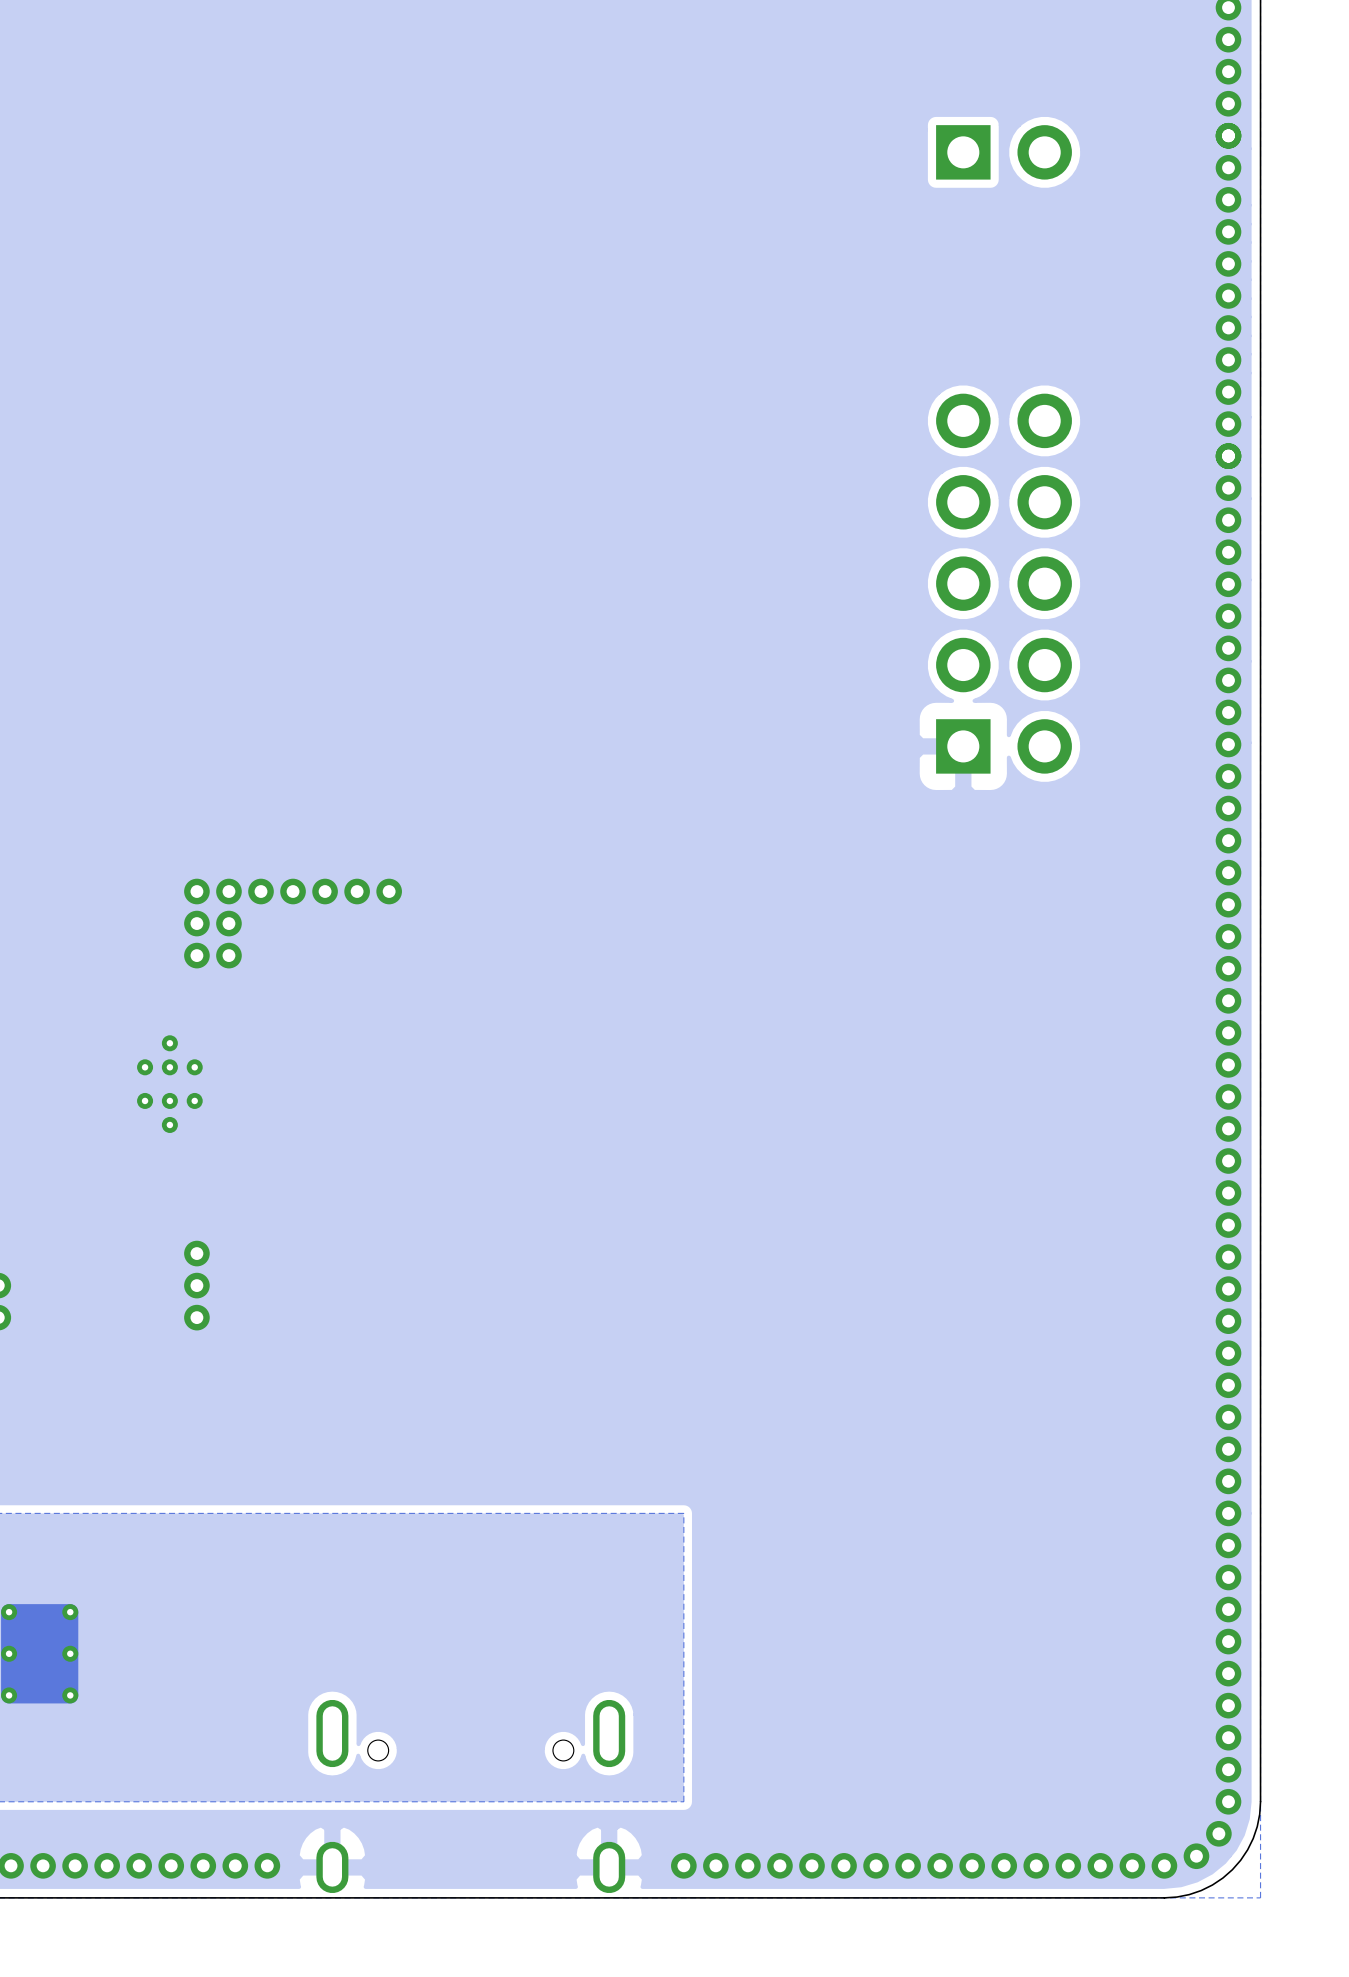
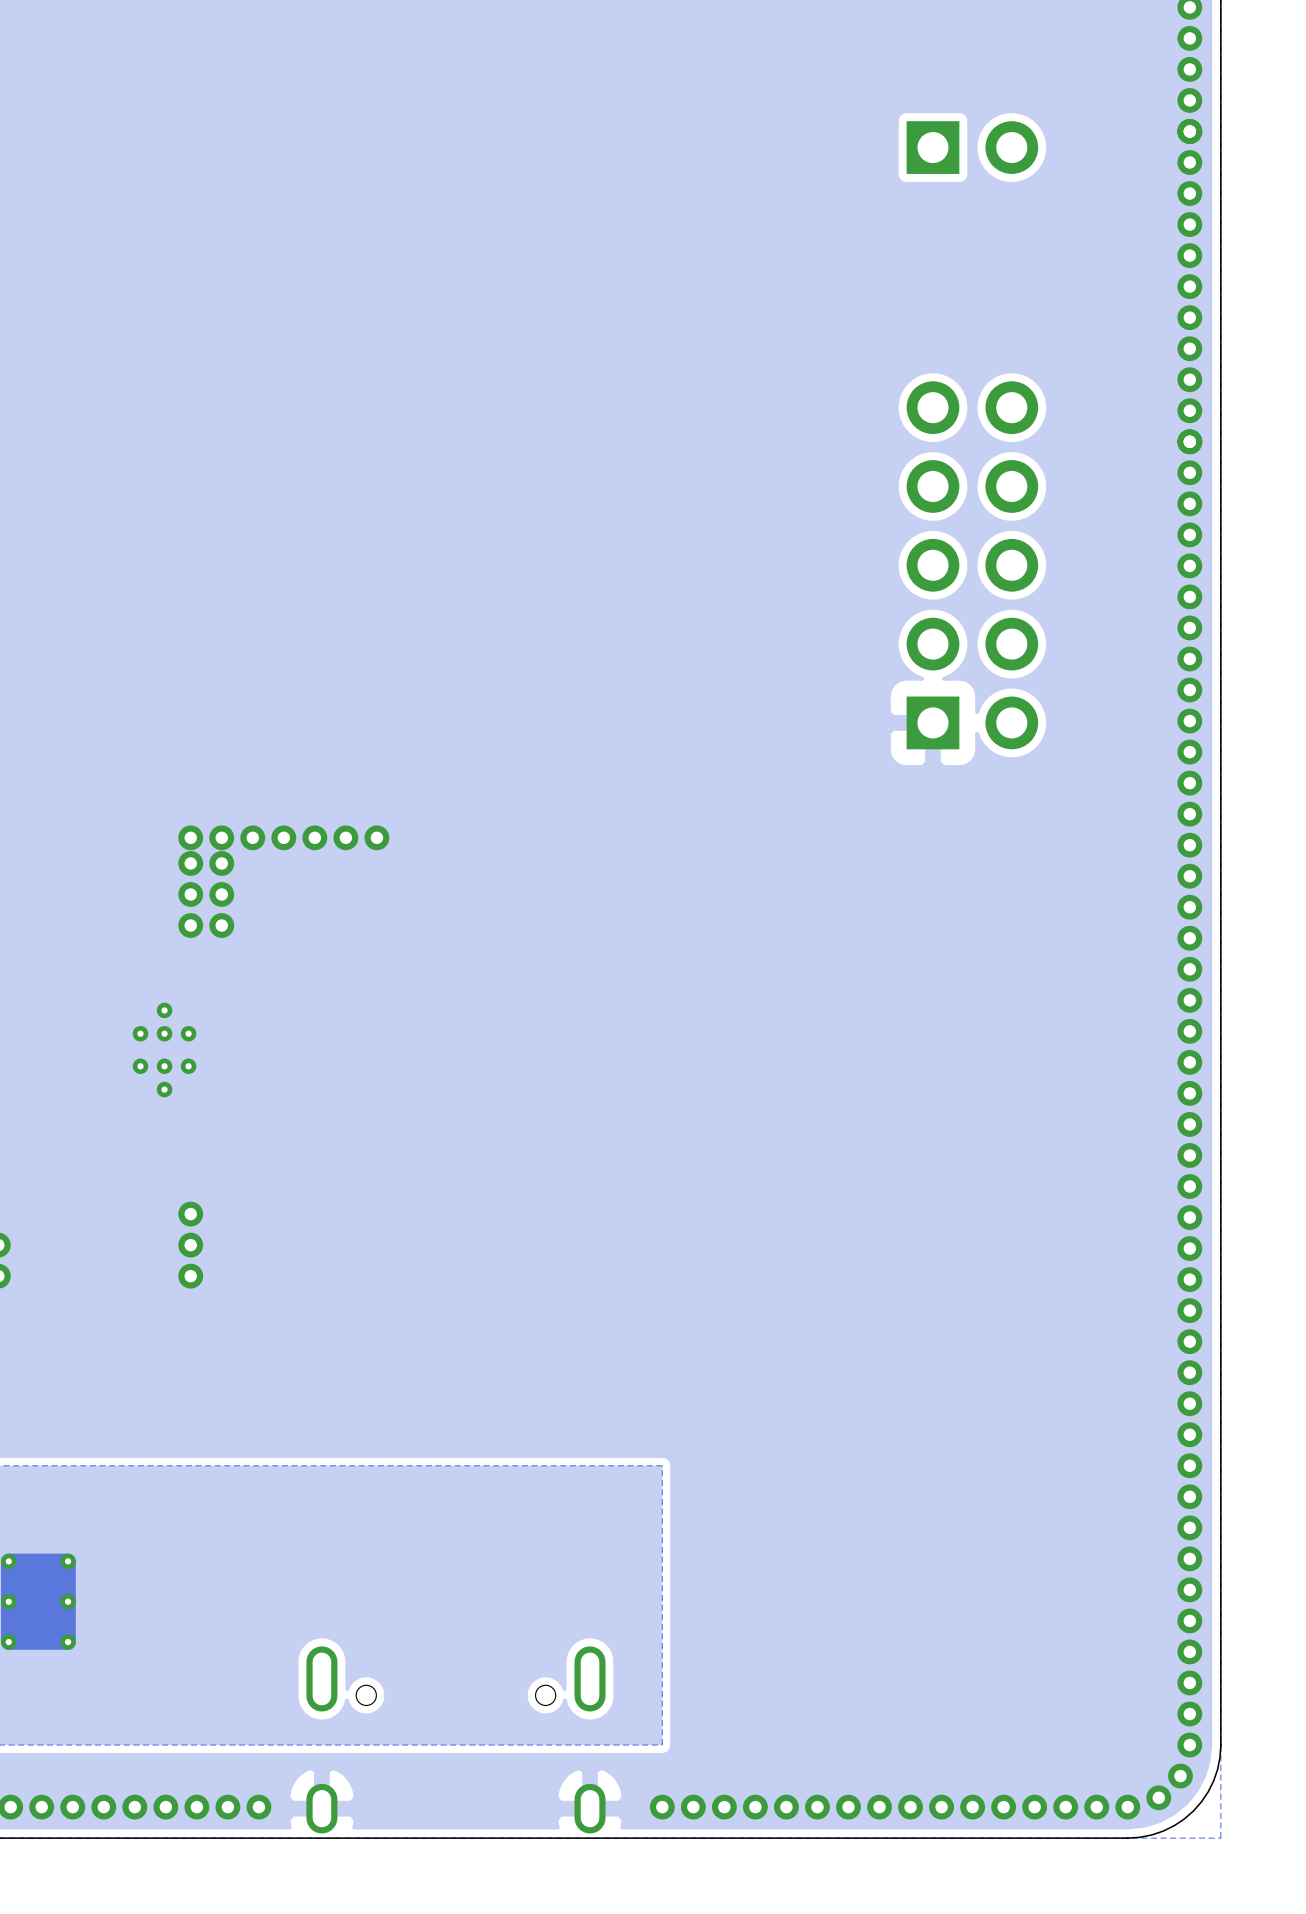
via: none -> (190, 837)
via: none -> (221, 837)
via: none -> (252, 837)
via: none -> (283, 837)
via: none -> (314, 837)
via: none -> (345, 837)
via: none -> (376, 837)
via: (261, 891) -> none
via: (293, 891) -> none
via: (325, 891) -> none
via: (357, 891) -> none
via: (389, 891) -> none

